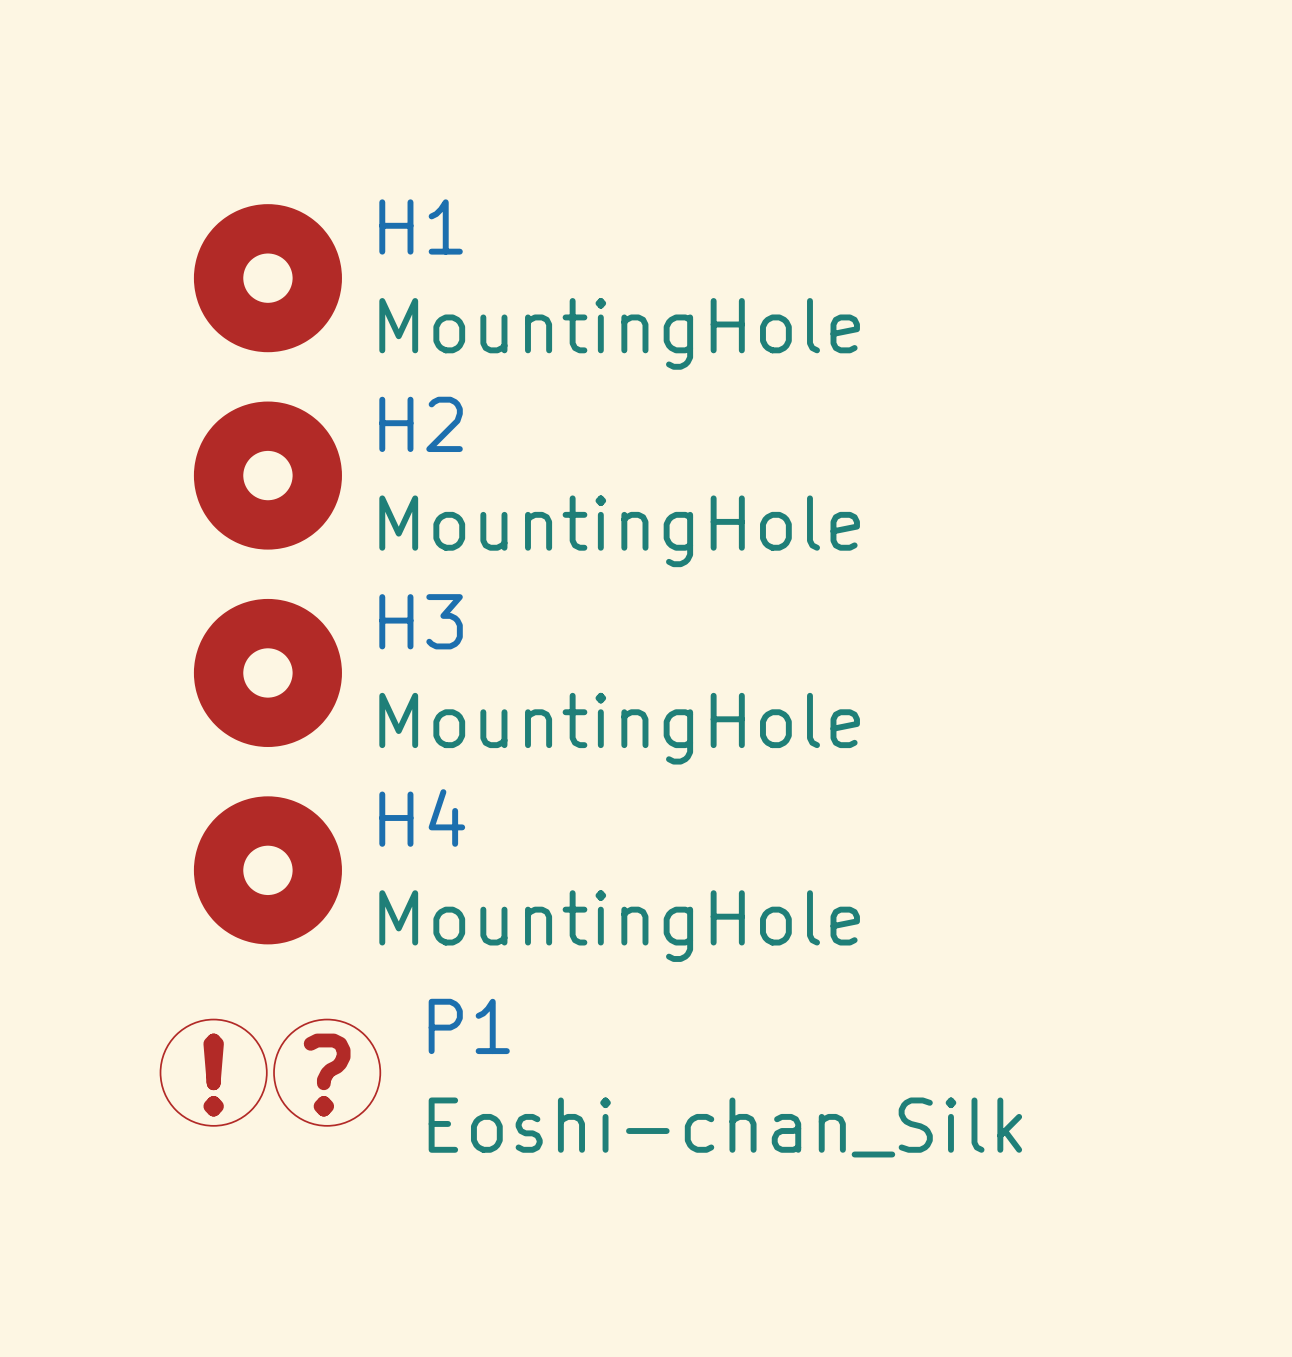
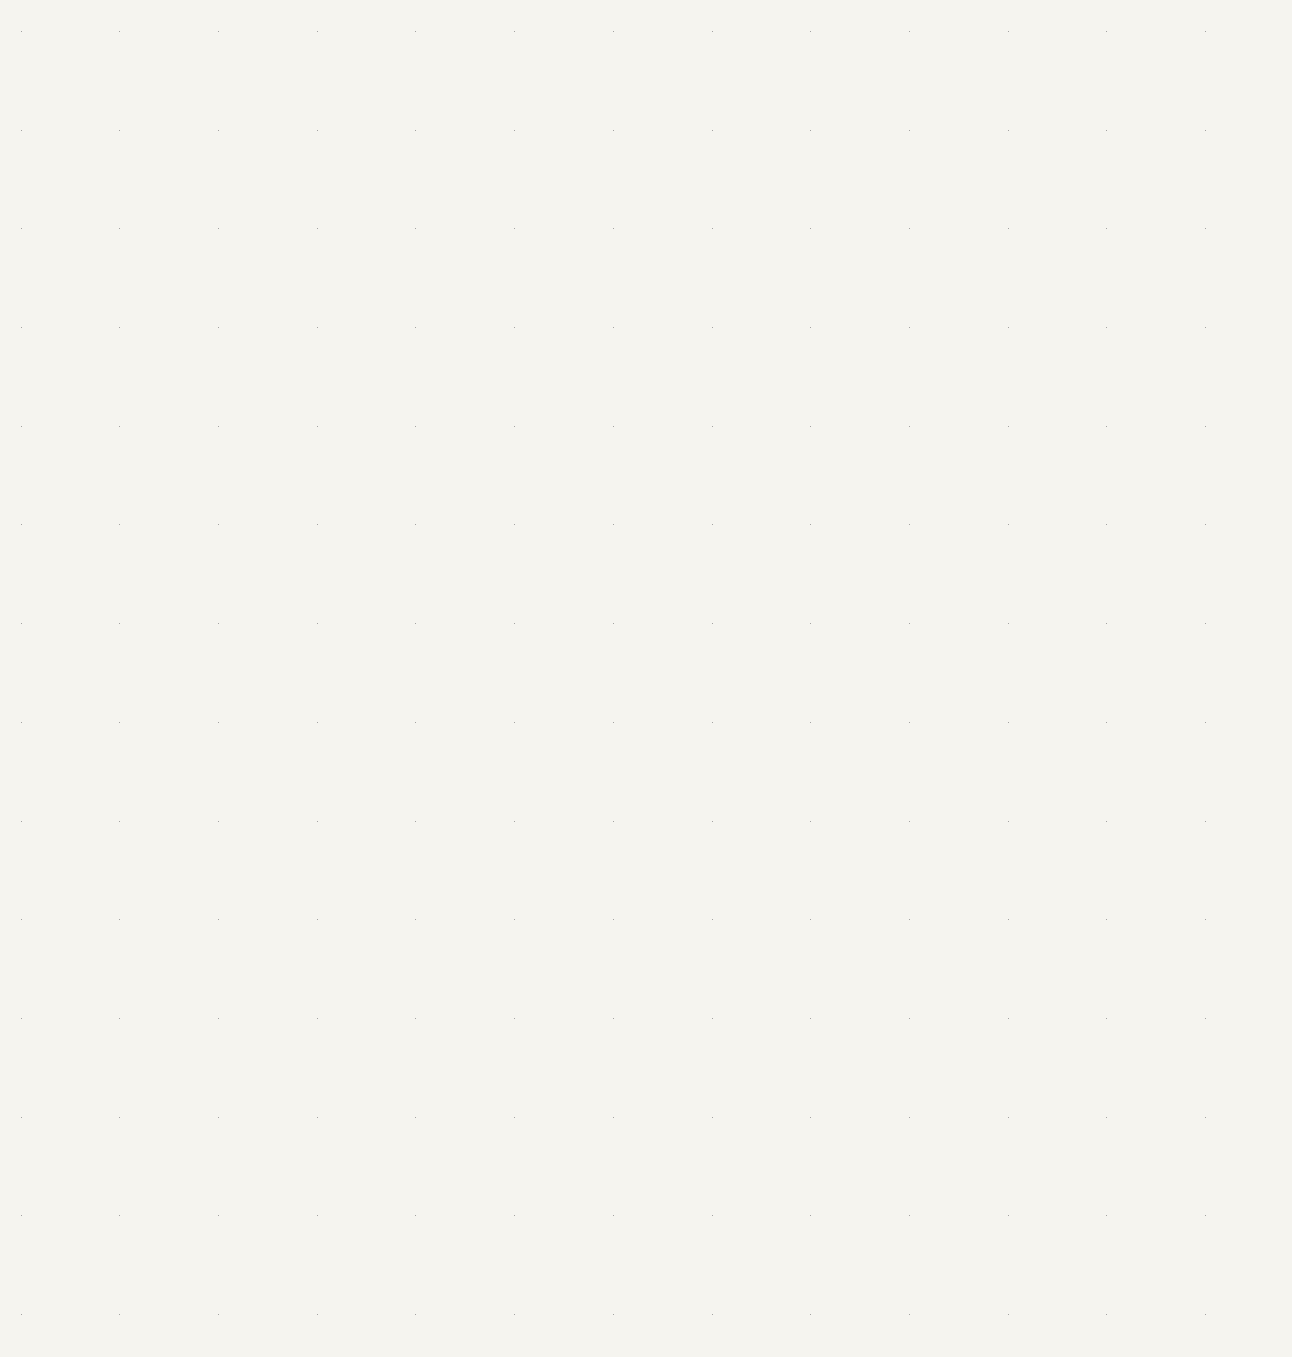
H1: MountingHole (267, 278) -> none
H2: MountingHole (267, 475) -> none
H3: MountingHole (267, 672) -> none
H4: MountingHole (267, 870) -> none
P1: Eoshi-chan_Silk (270, 1072) -> none

